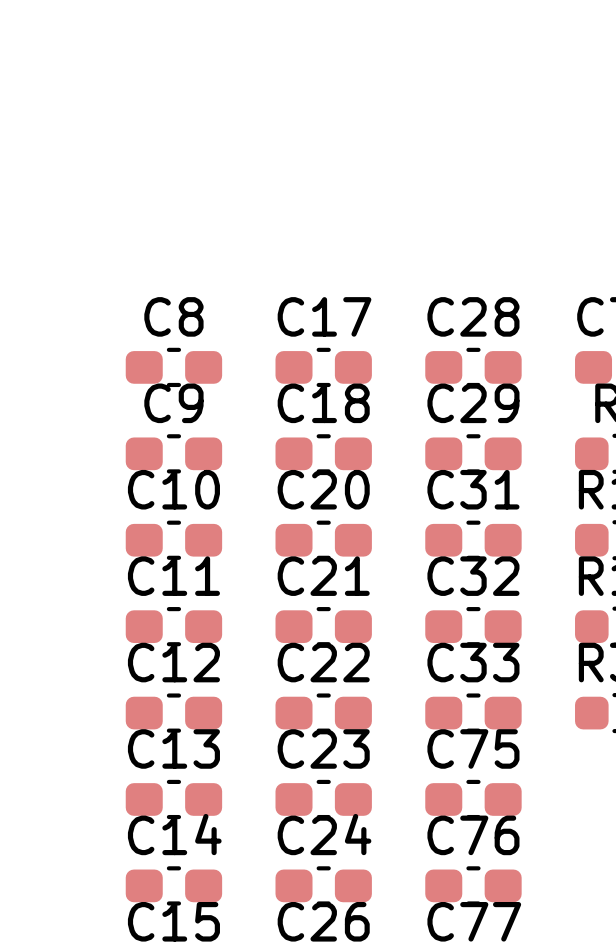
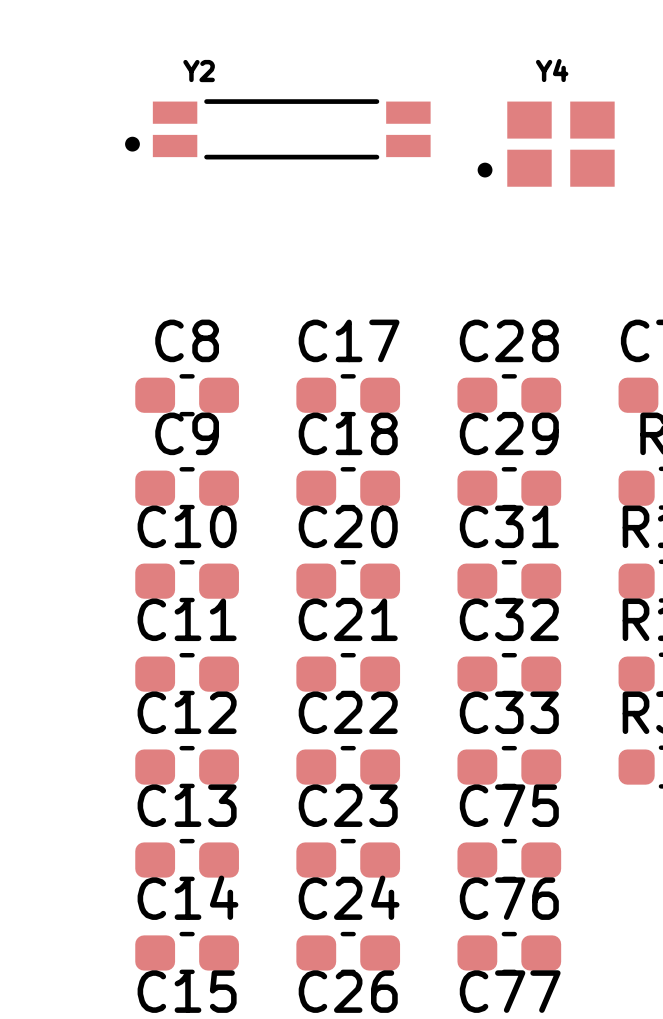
Y2: none -> (277, 129)
Y4: none -> (546, 144)

